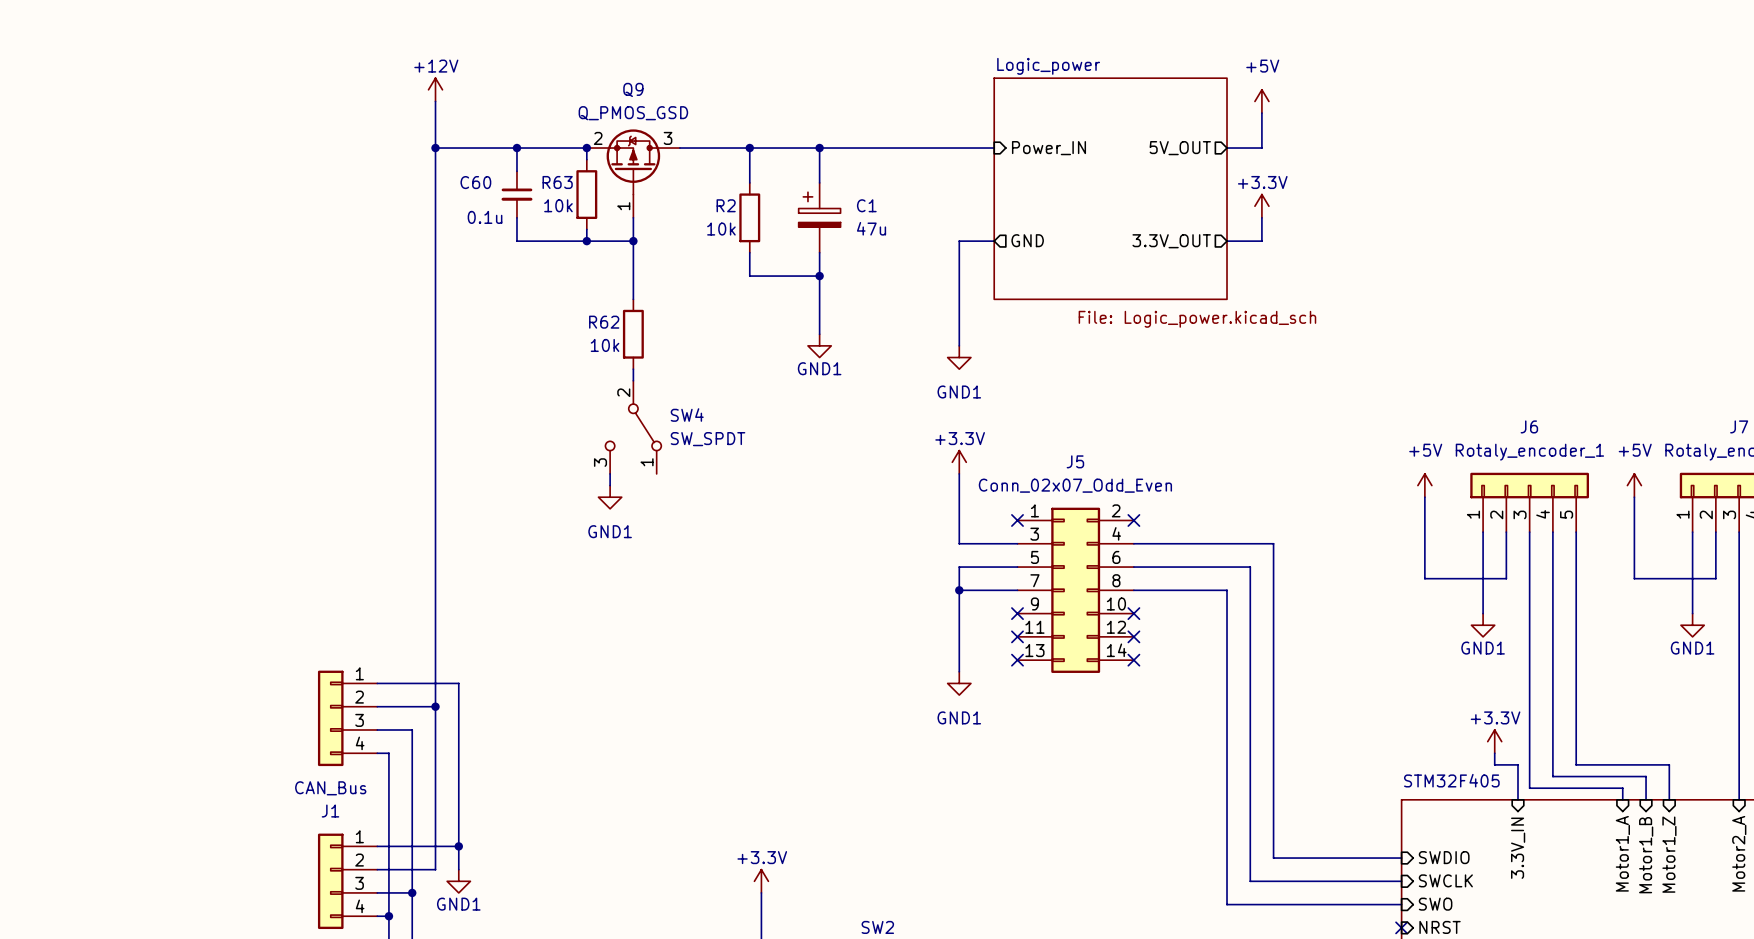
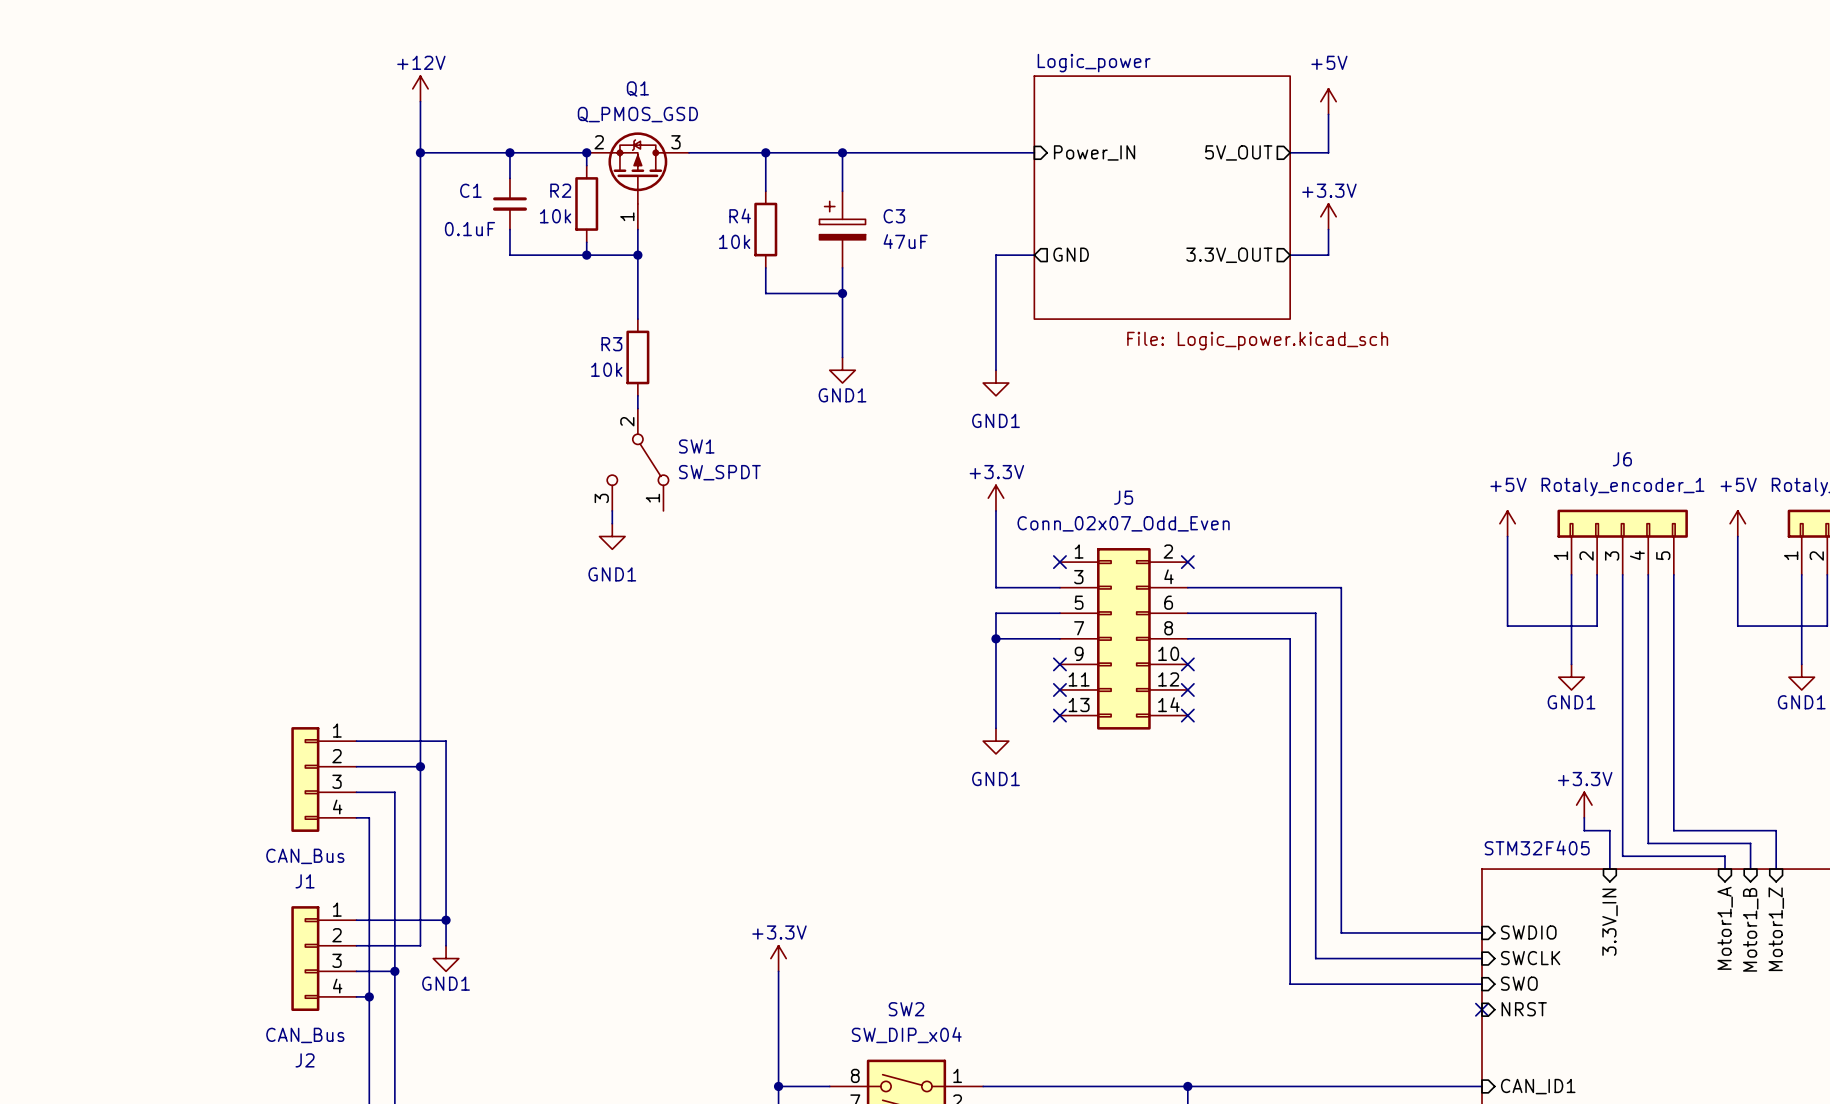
Q9 name: Q9 (633, 89) -> Q1 (637, 89)
C60 name: C60 (475, 182) -> C1 (470, 190)
R63 name: R63 (557, 182) -> R2 (560, 190)
R2 name: R2 (726, 205) -> R4 (740, 215)
C1 name: C1 (866, 205) -> C3 (894, 216)
C60 value: 0.1u (485, 217) -> 0.1uF (469, 229)
C1 value: 47u (871, 228) -> 47uF (905, 241)
R62 name: R62 (604, 322) -> R3 (611, 344)
SW4 name: SW4 (687, 415) -> SW1 (696, 446)

